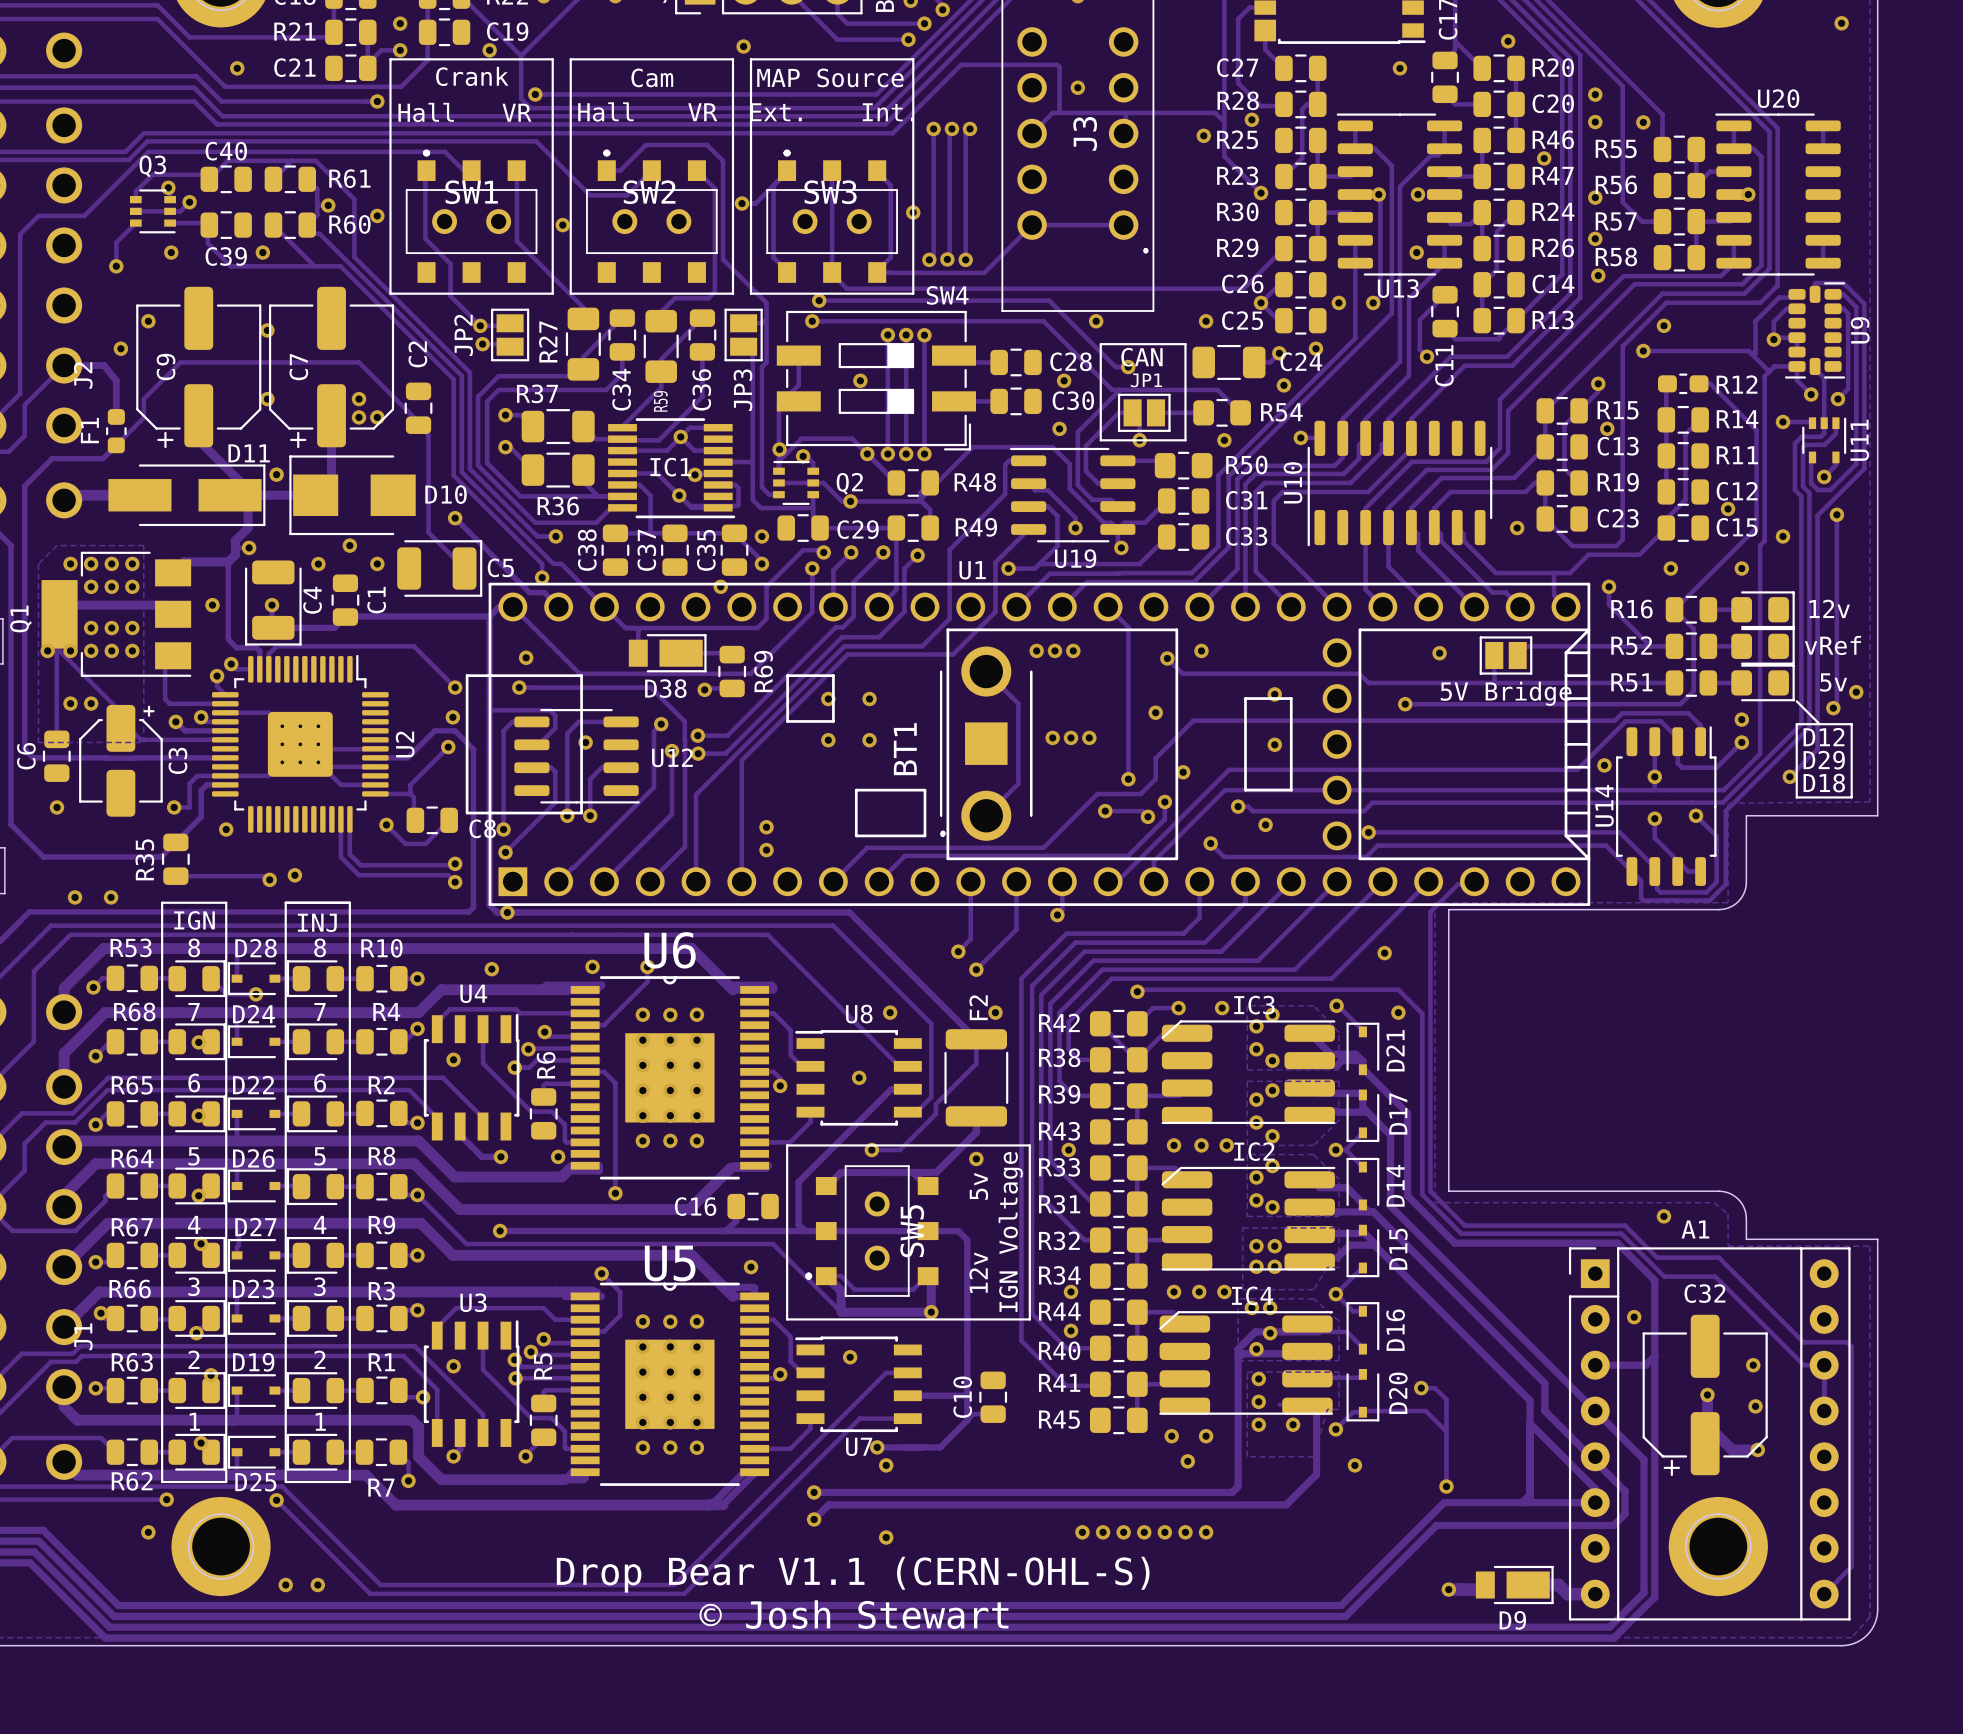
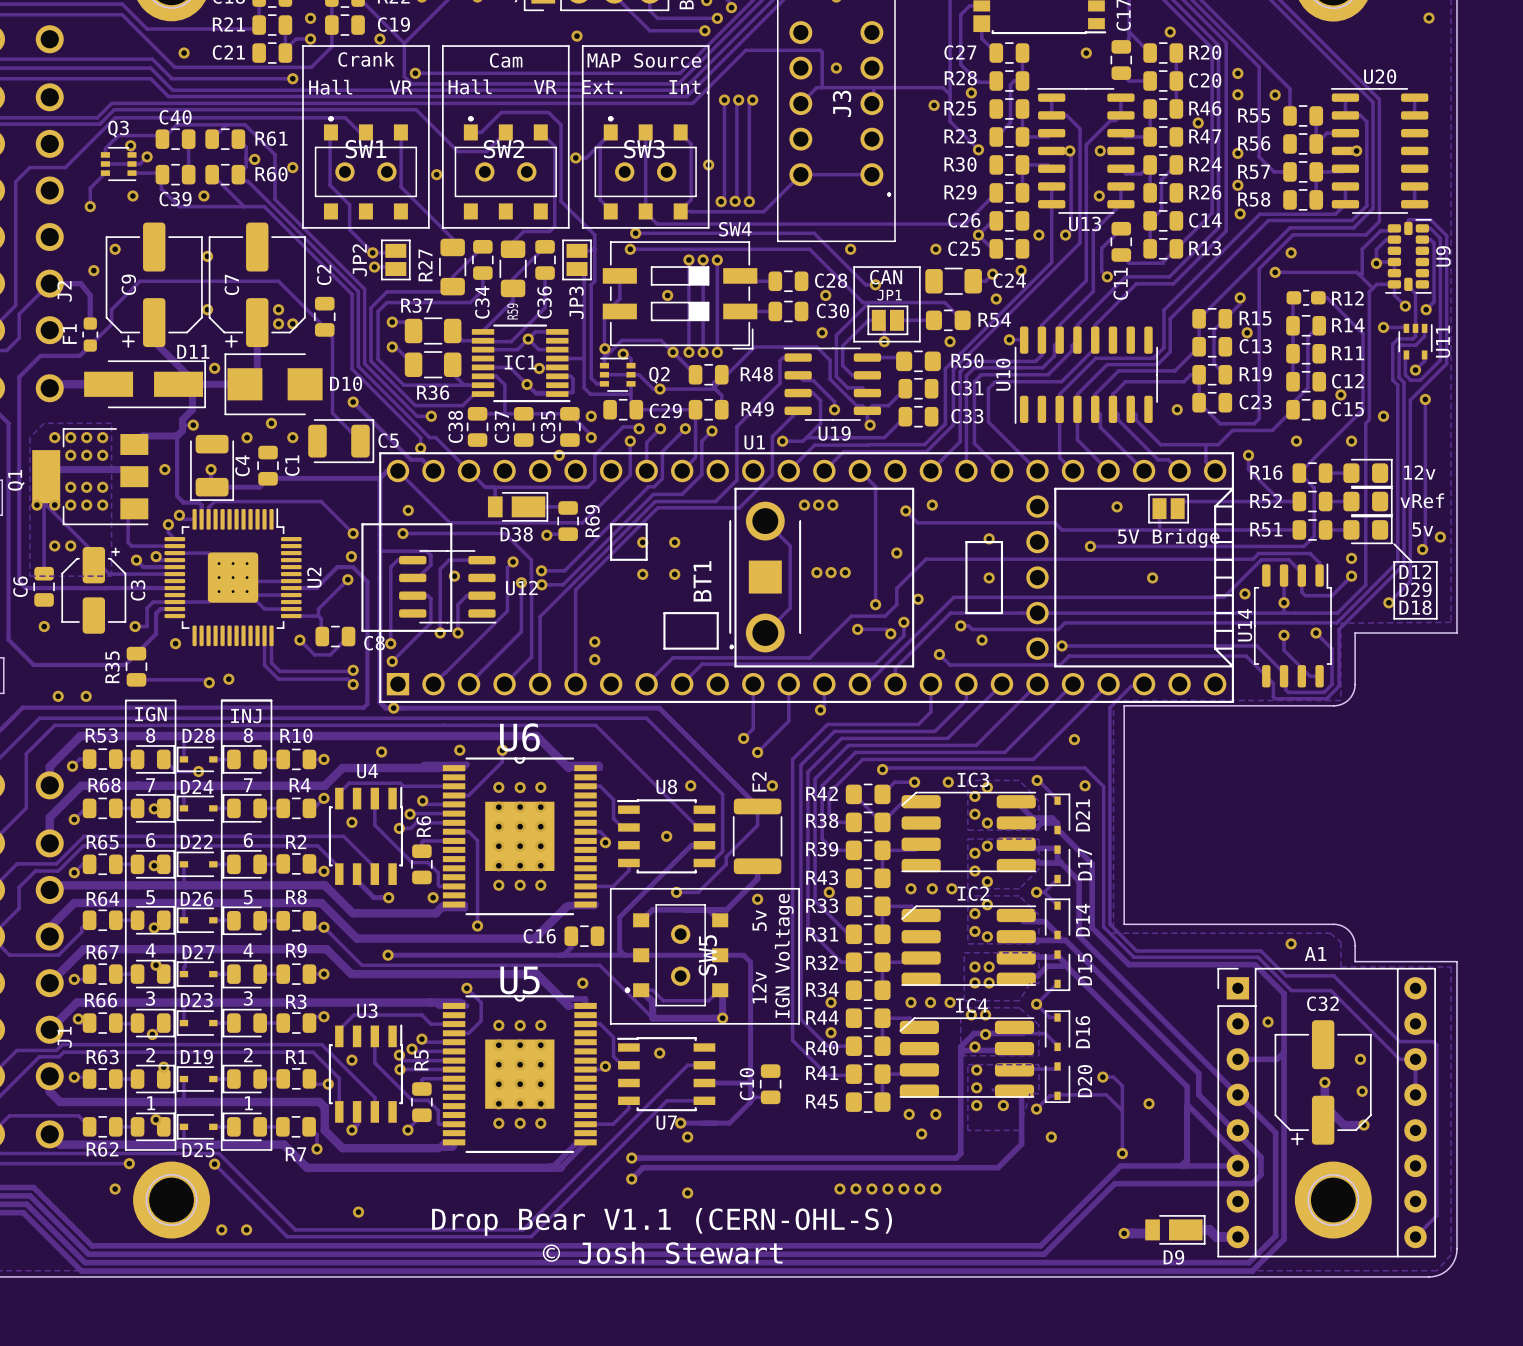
track: none -> (188, 139) (188, 174)
via: none -> (1152, 577)
via: none -> (1149, 1103)
via: none -> (358, 1212)

